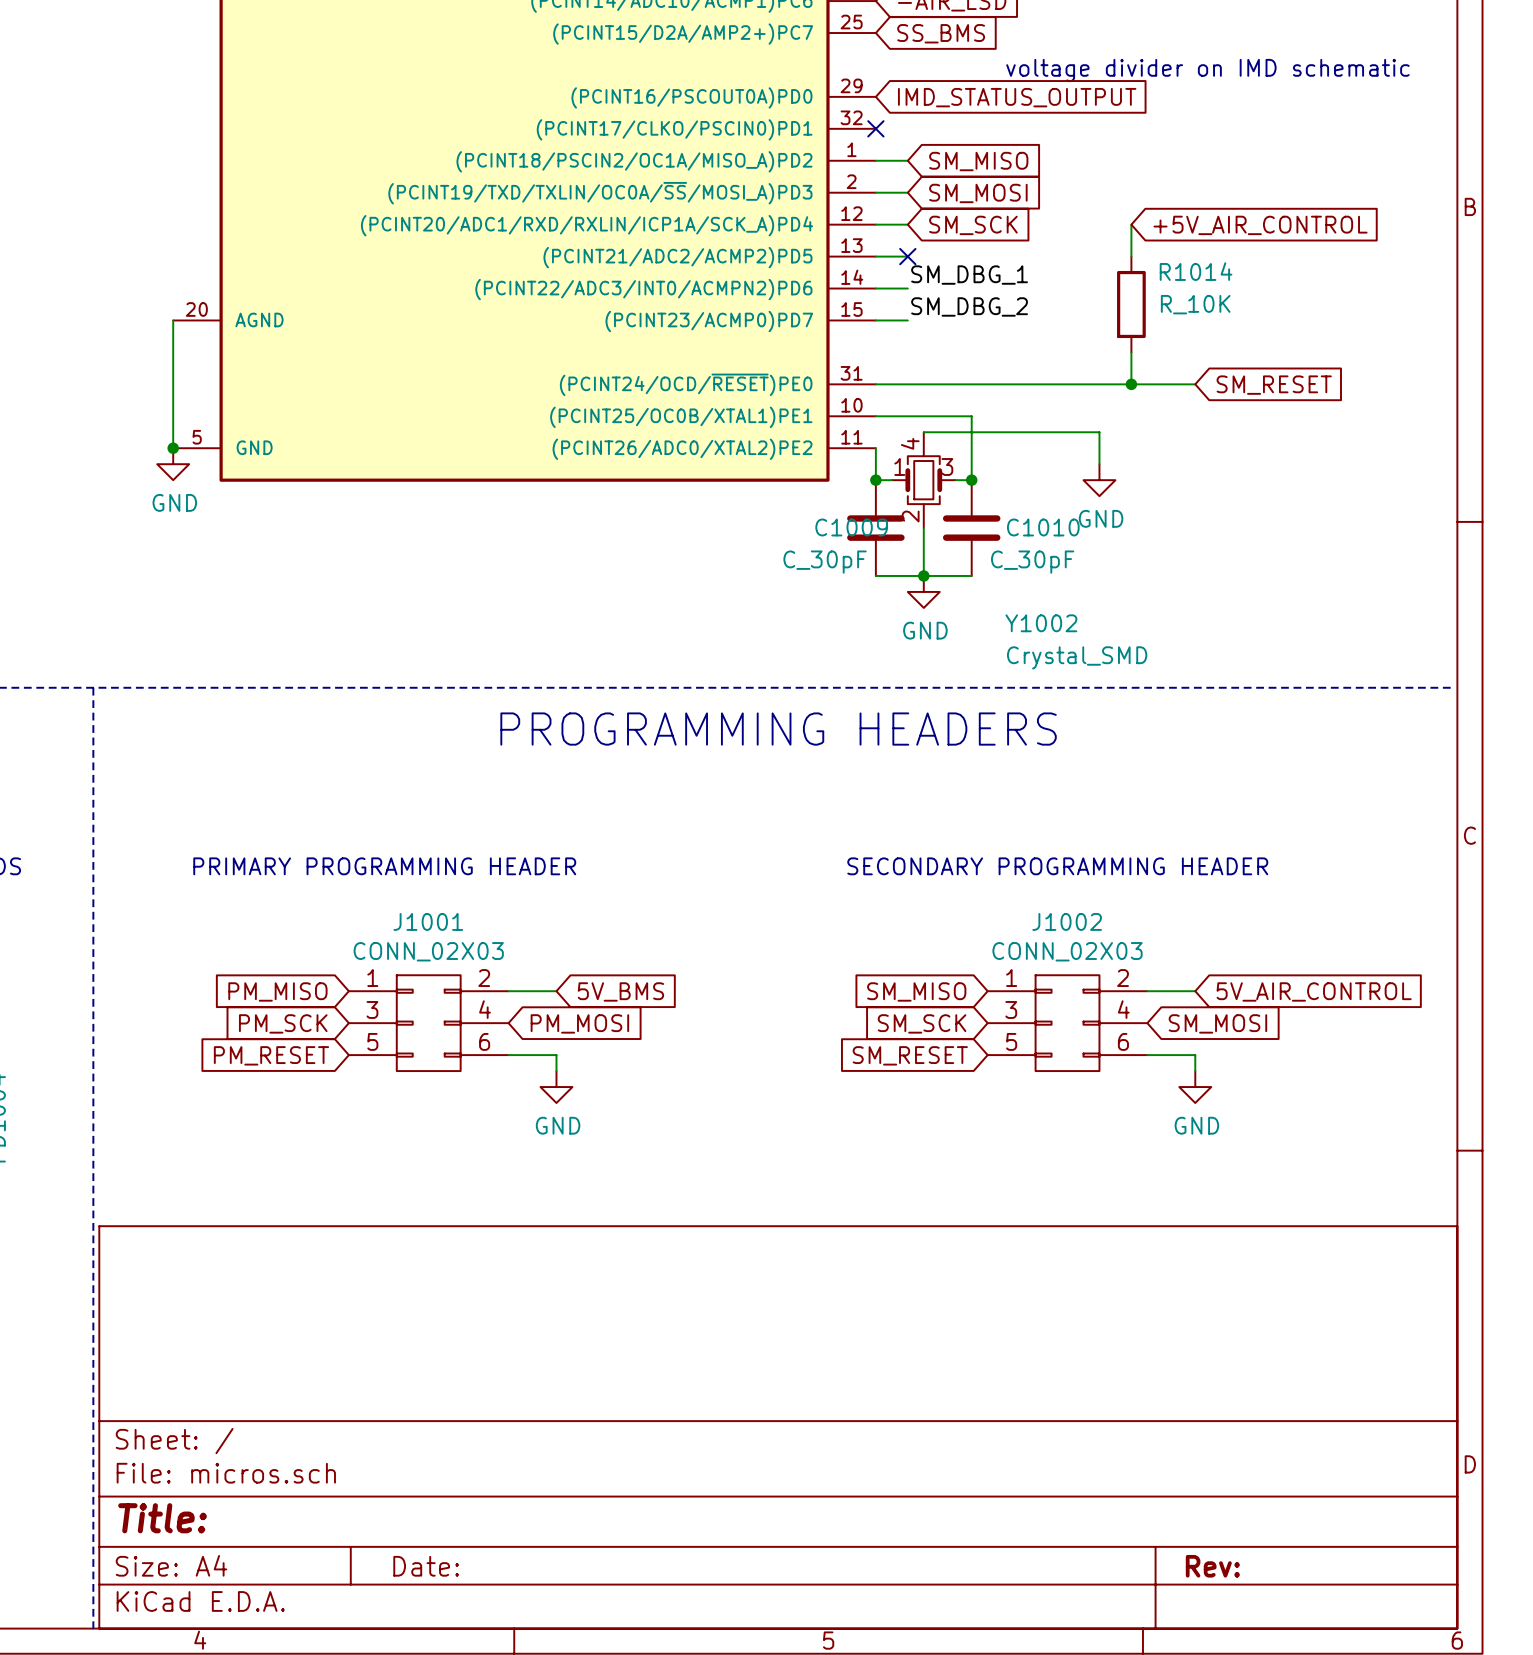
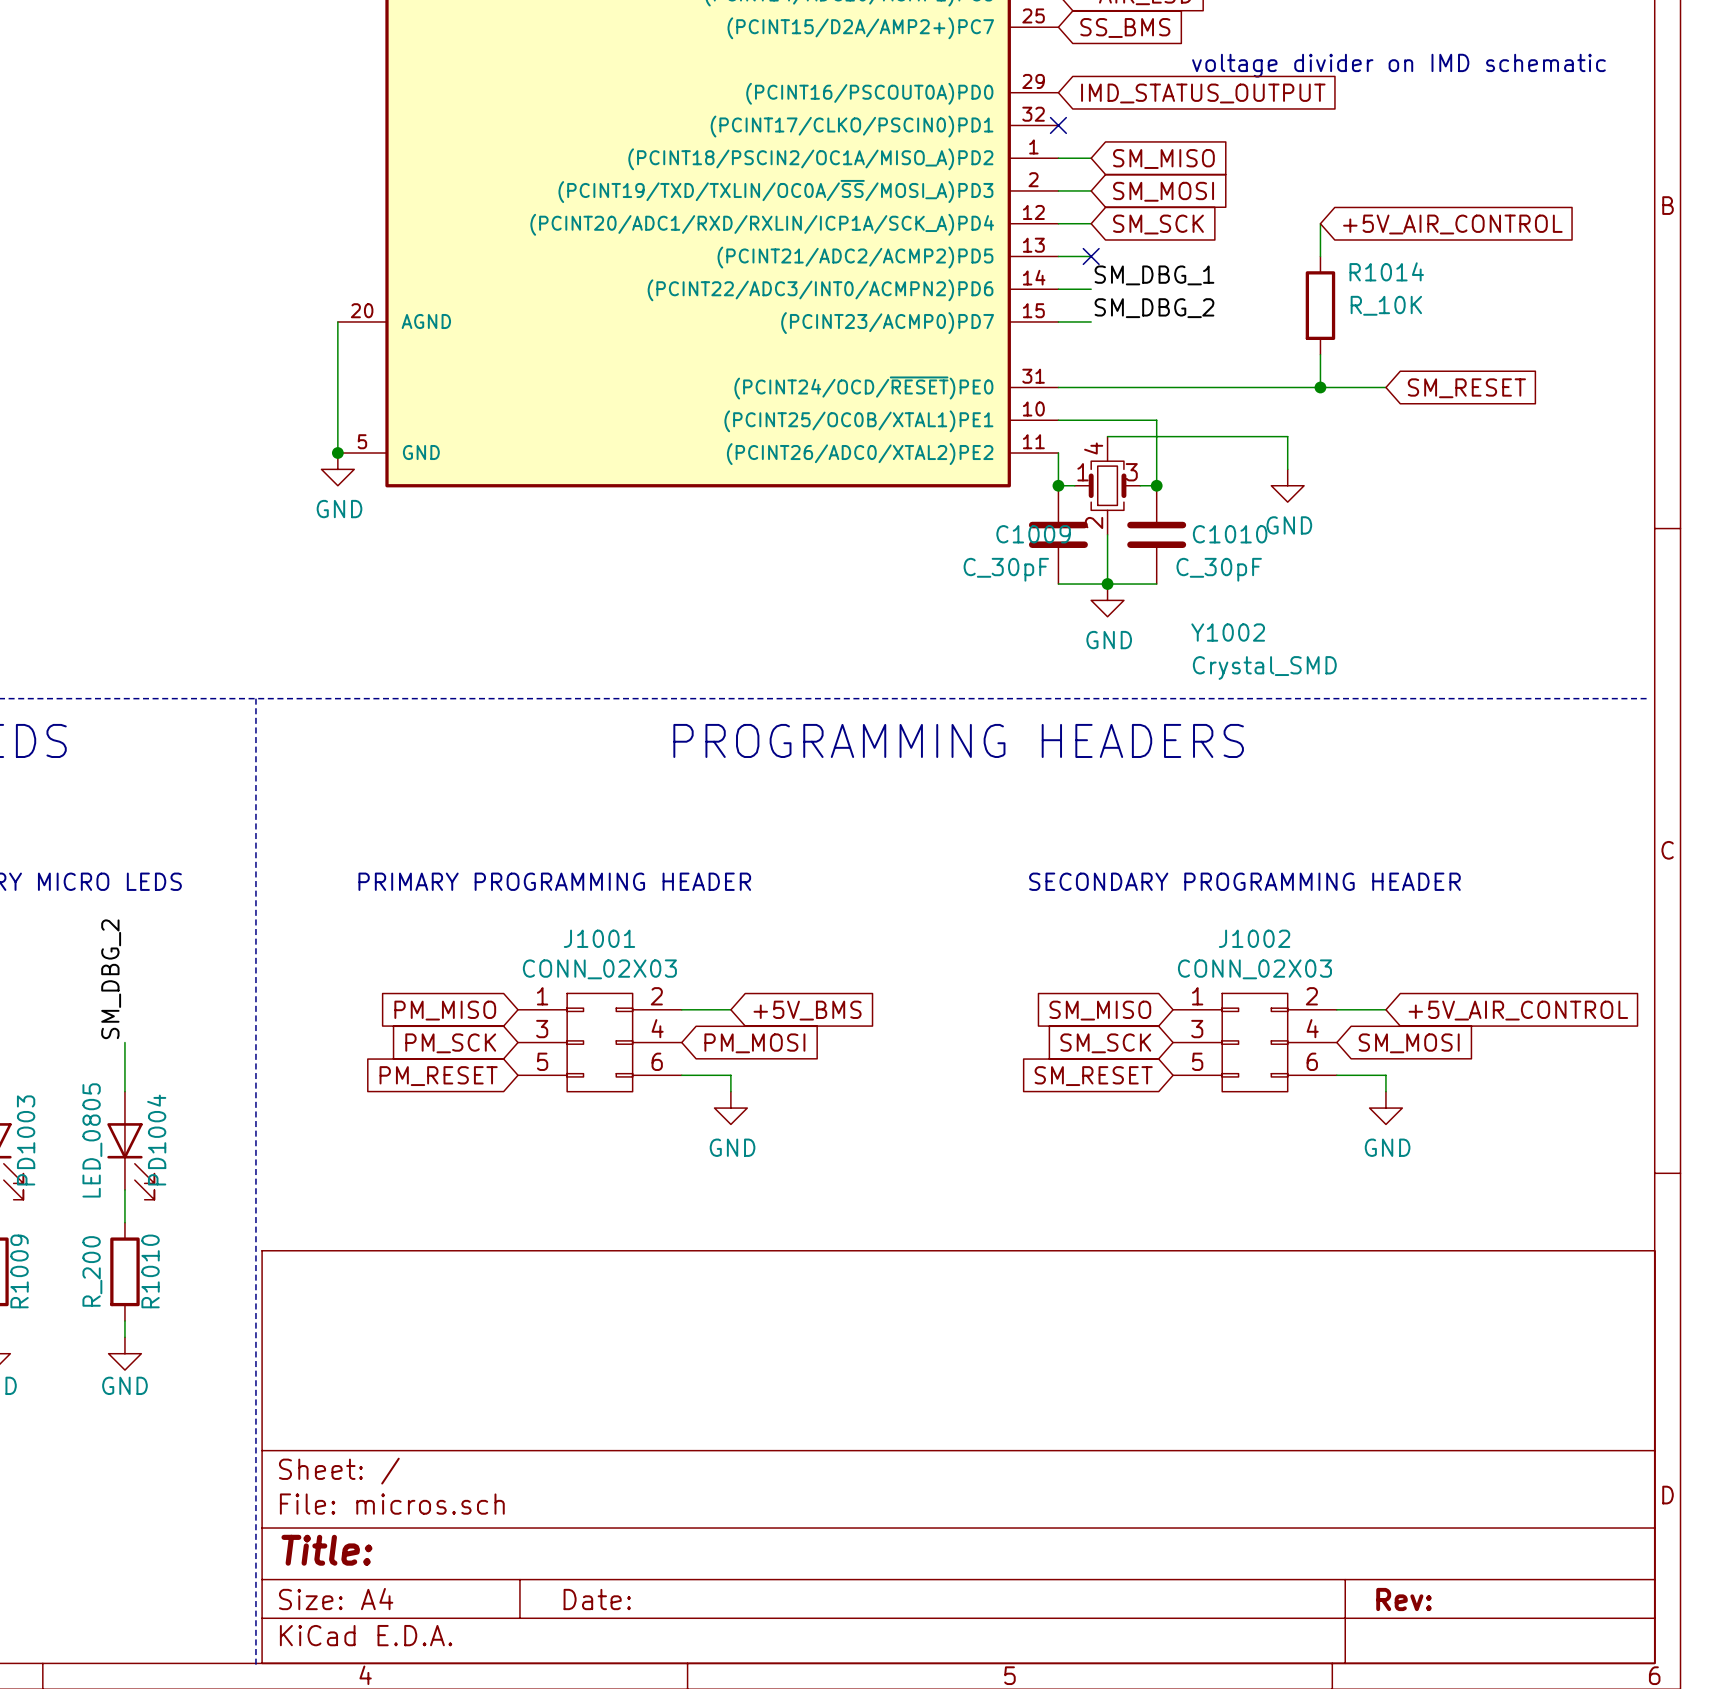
global label: 5V_BMS (620, 991) -> +5V_BMS (807, 1010)
global label: 5V_AIR_CONTROL (1314, 991) -> +5V_AIR_CONTROL (1518, 1010)

